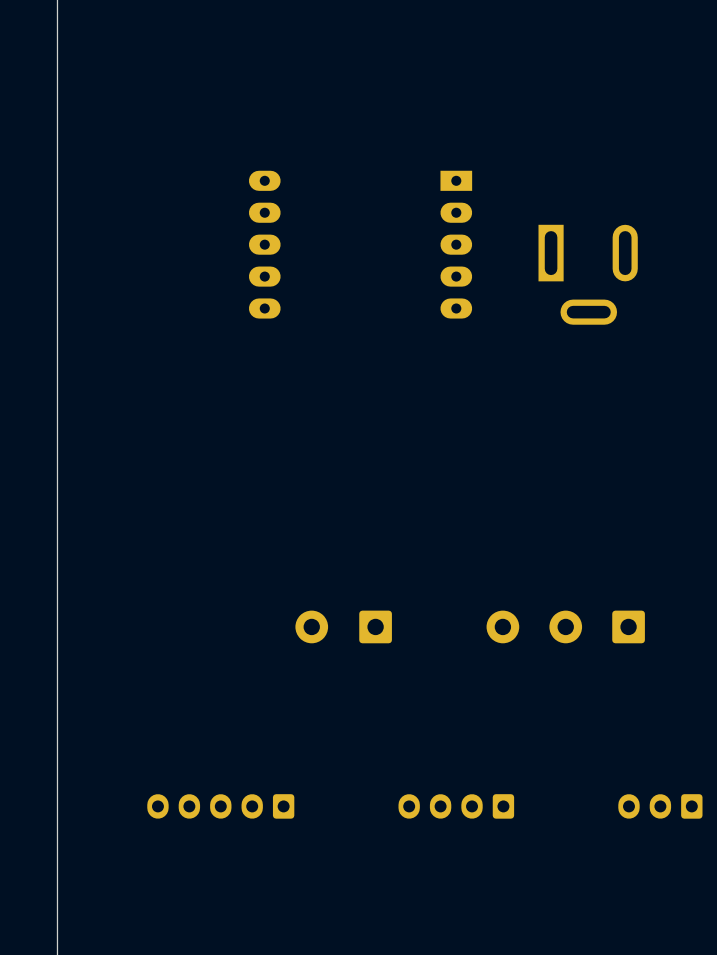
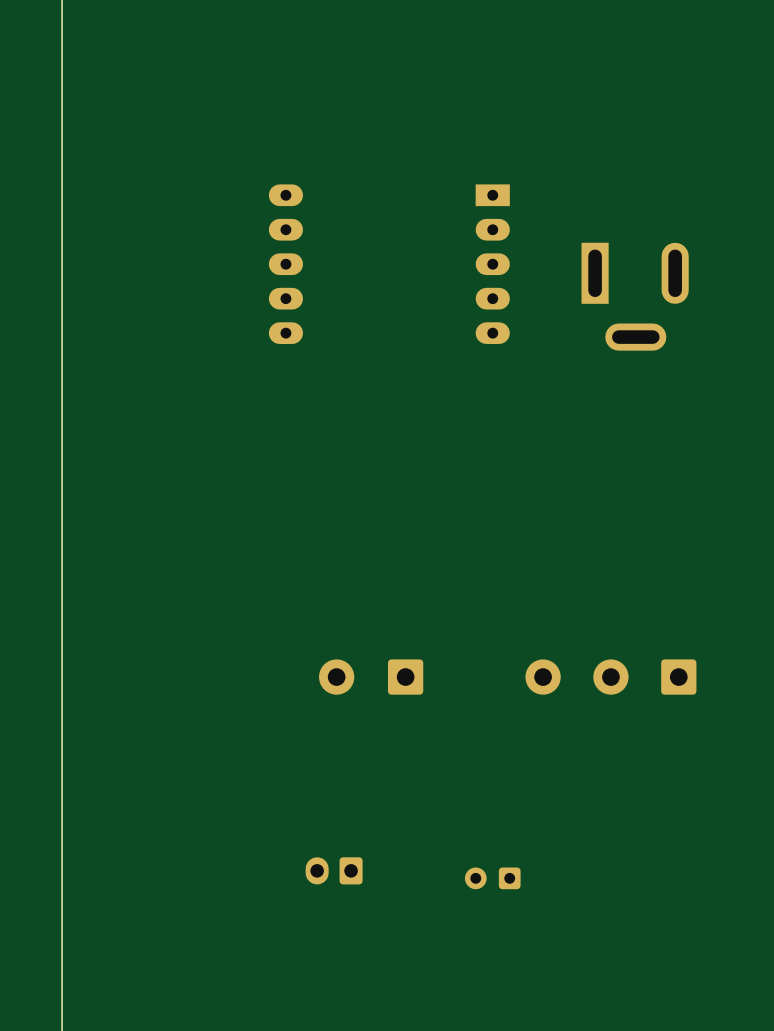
part footprint: [398, 794, 515, 819] -> [464, 867, 521, 890]
part: (220, 806) -> none
part: none -> (334, 870)
part: (660, 806) -> none

